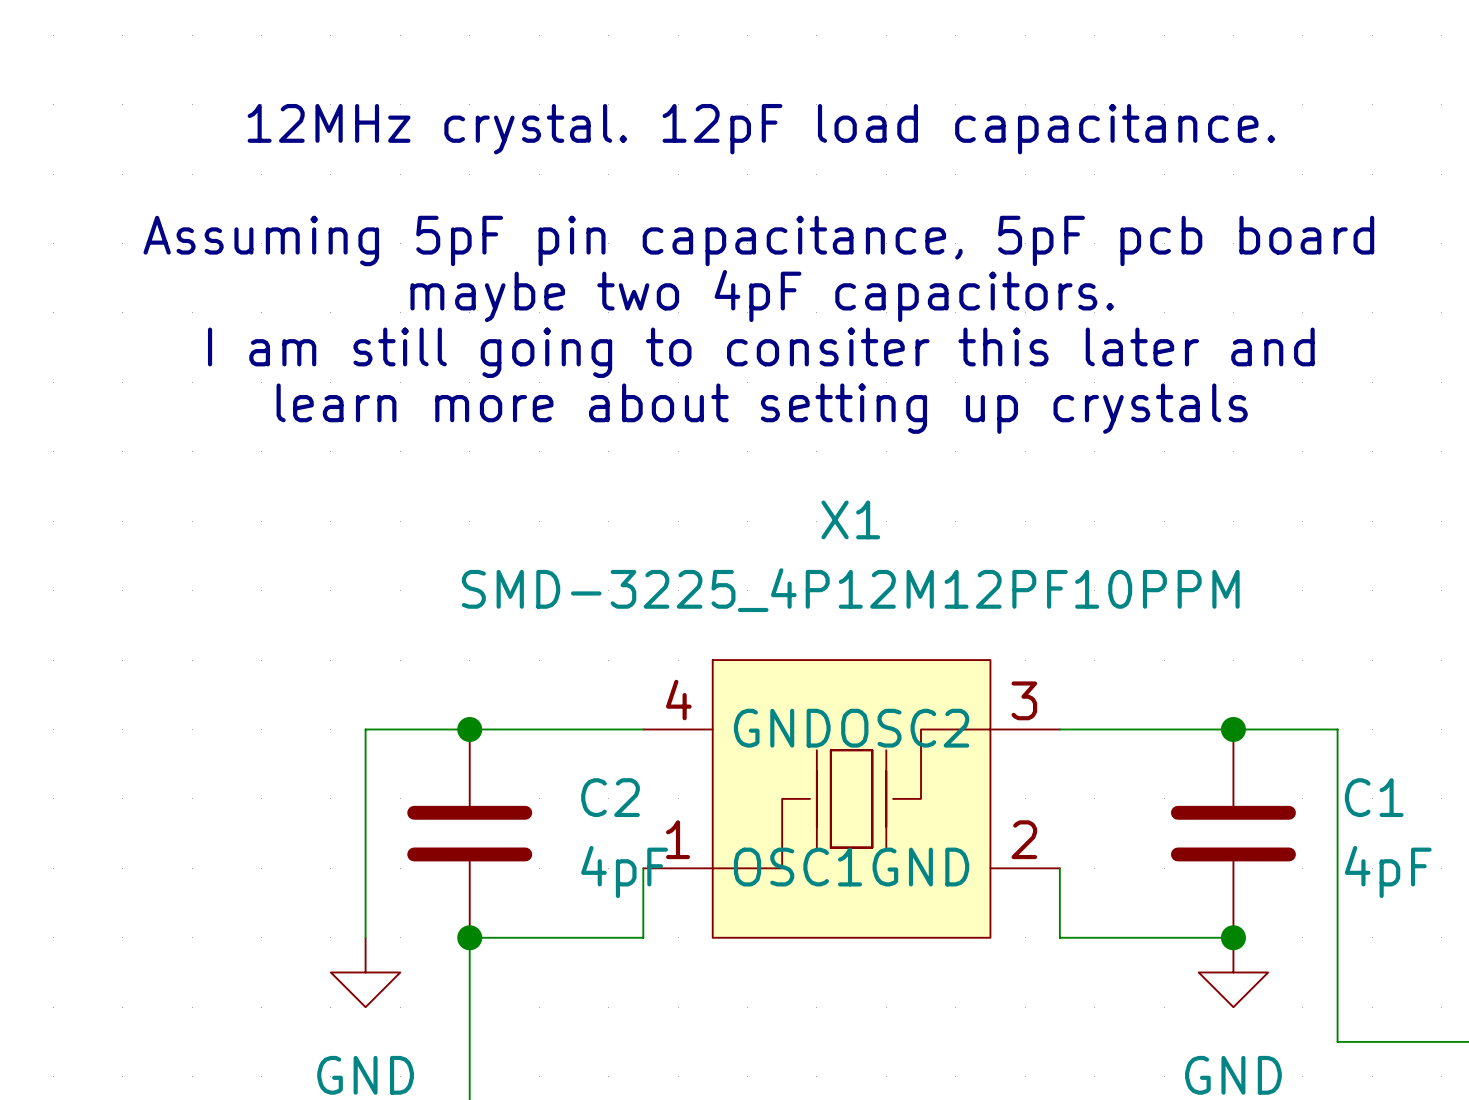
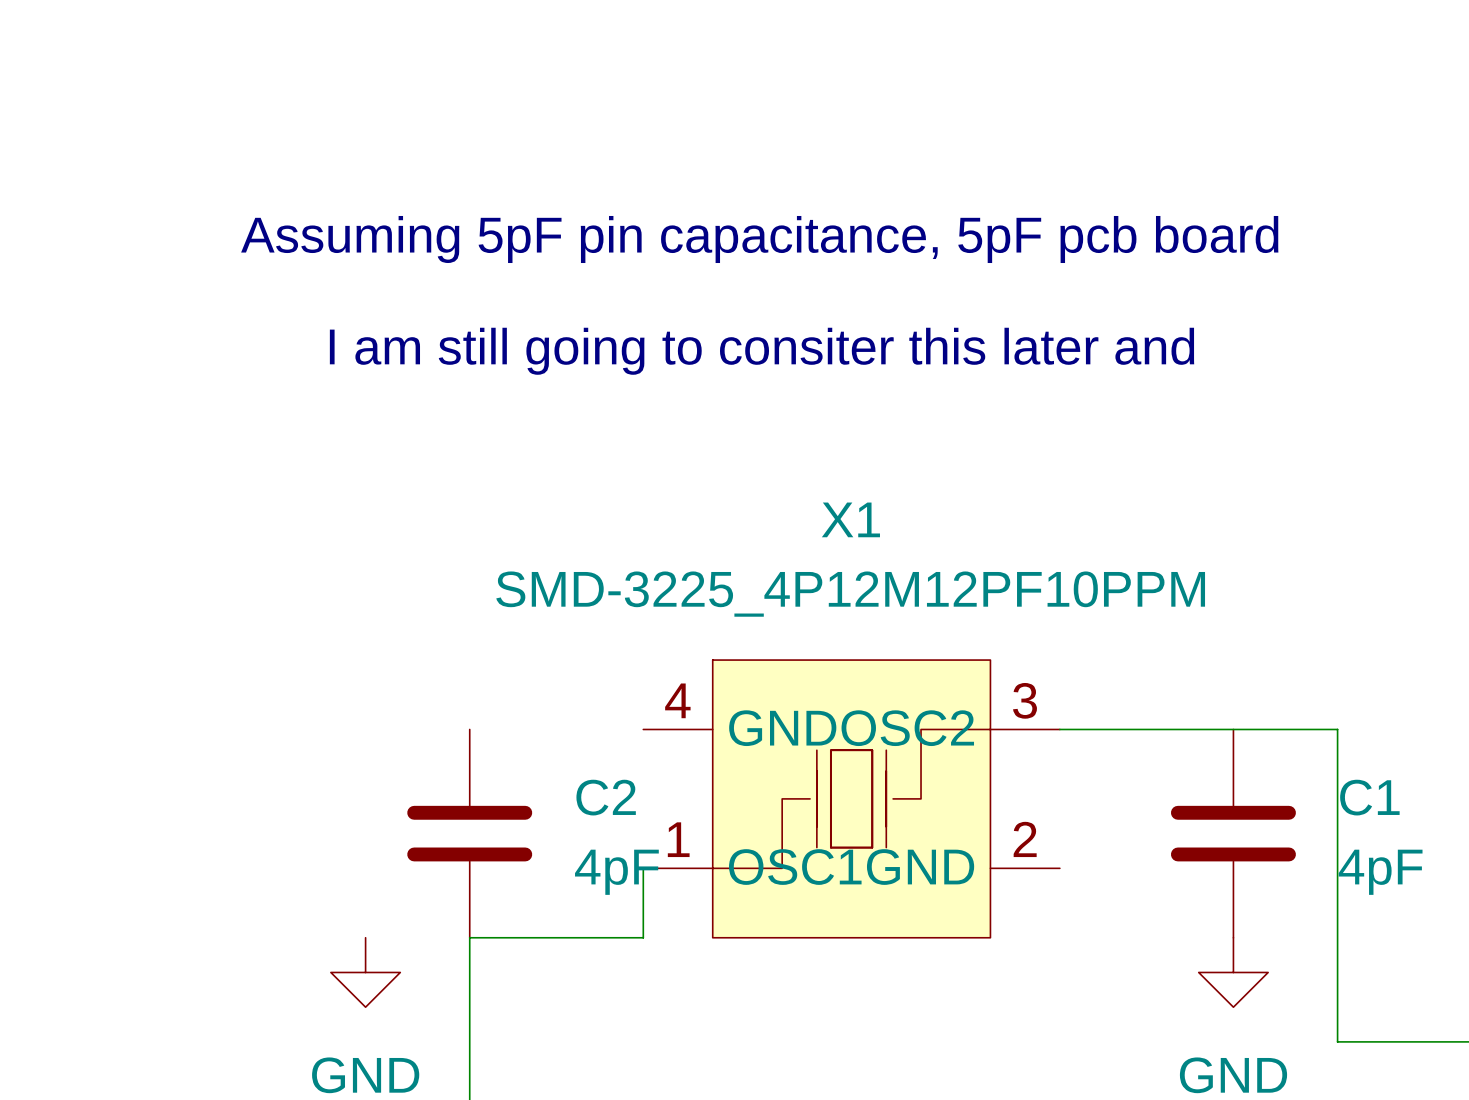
text: 12MHz crystal. 12pF load capacitance. (761, 129) -> none
text: maybe two 4pF capacitors. (762, 296) -> none
text: learn more about setting up crystals (762, 408) -> none
junction: (469, 729) -> none
wire: (643, 729) (365, 729) (365, 937) -> none
junction: (1233, 729) -> none
wire: (1059, 868) (1059, 937) (1233, 937) -> none
junction: (469, 937) -> none
junction: (1233, 937) -> none

